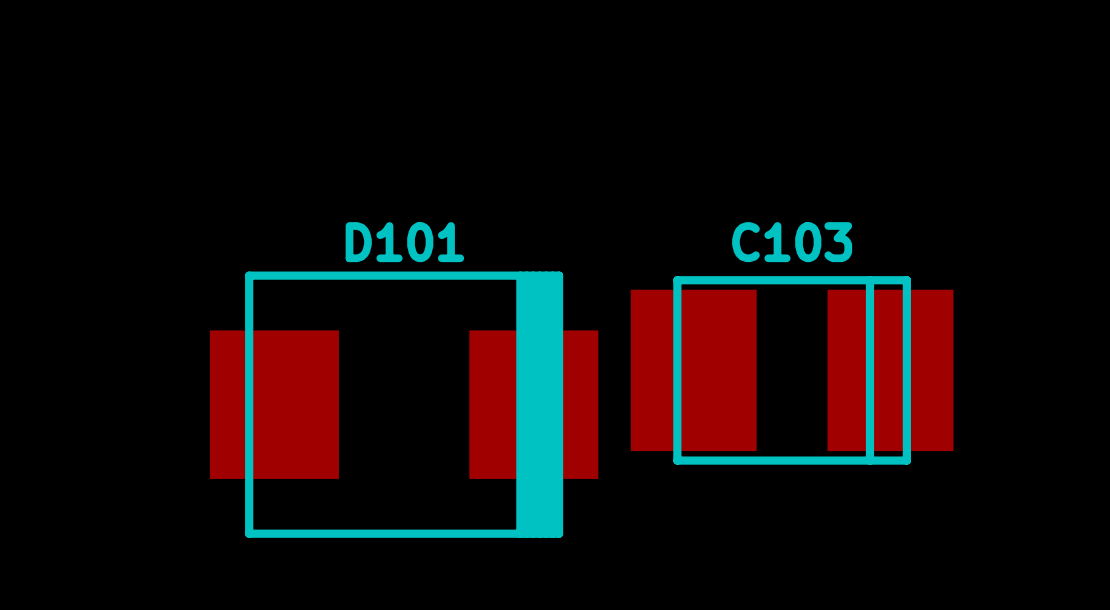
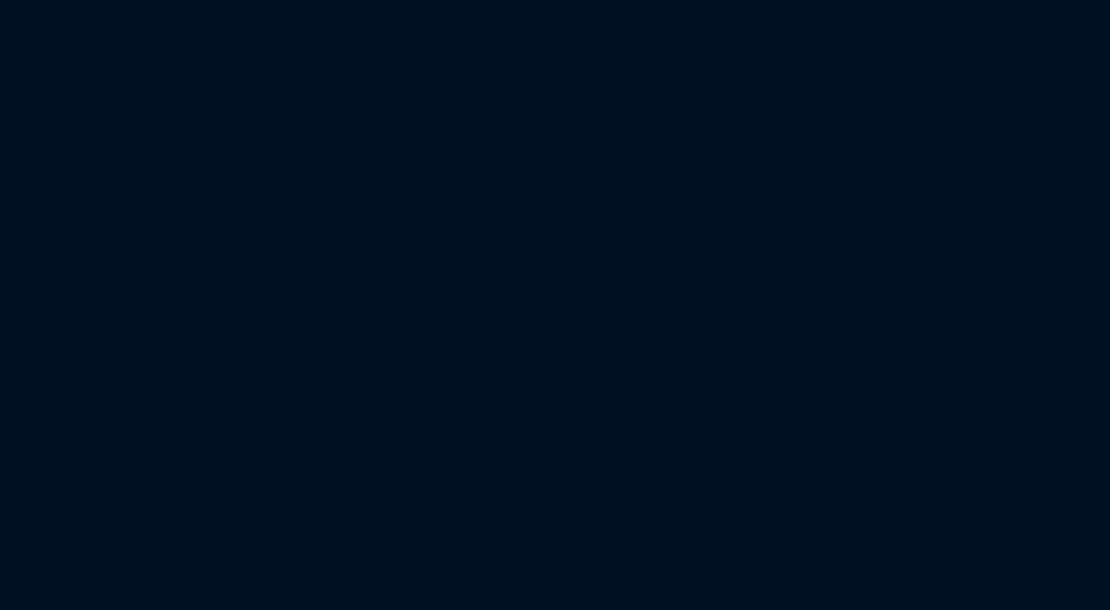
C103: (792, 370) -> none
D101: (404, 404) -> none

